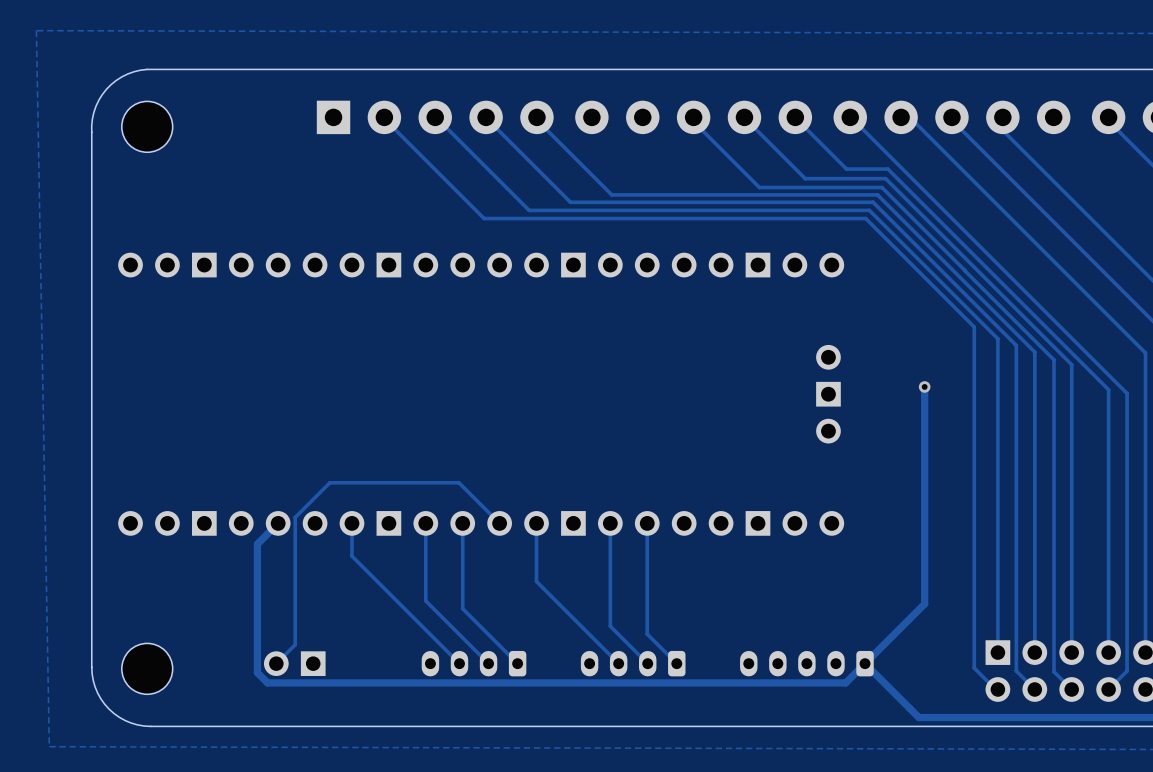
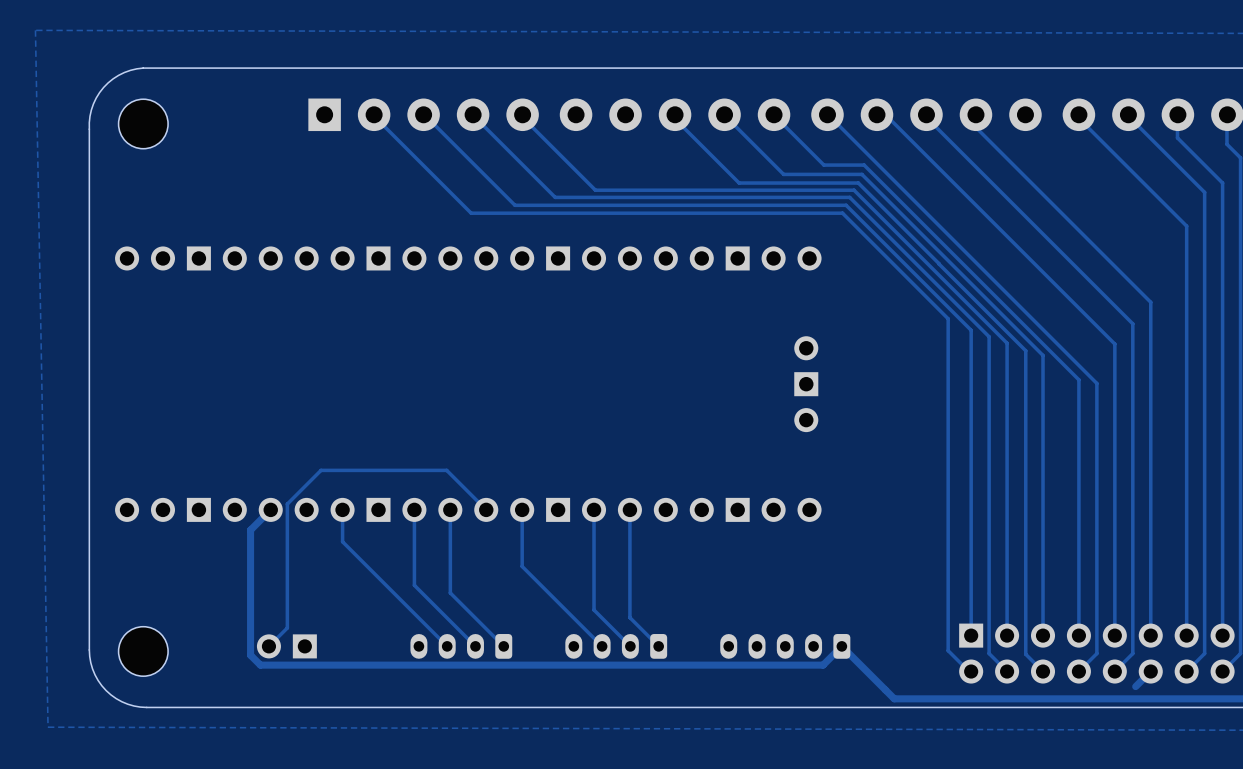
track: (924, 386) (924, 604) (865, 663) -> none
via: (924, 386) -> none

